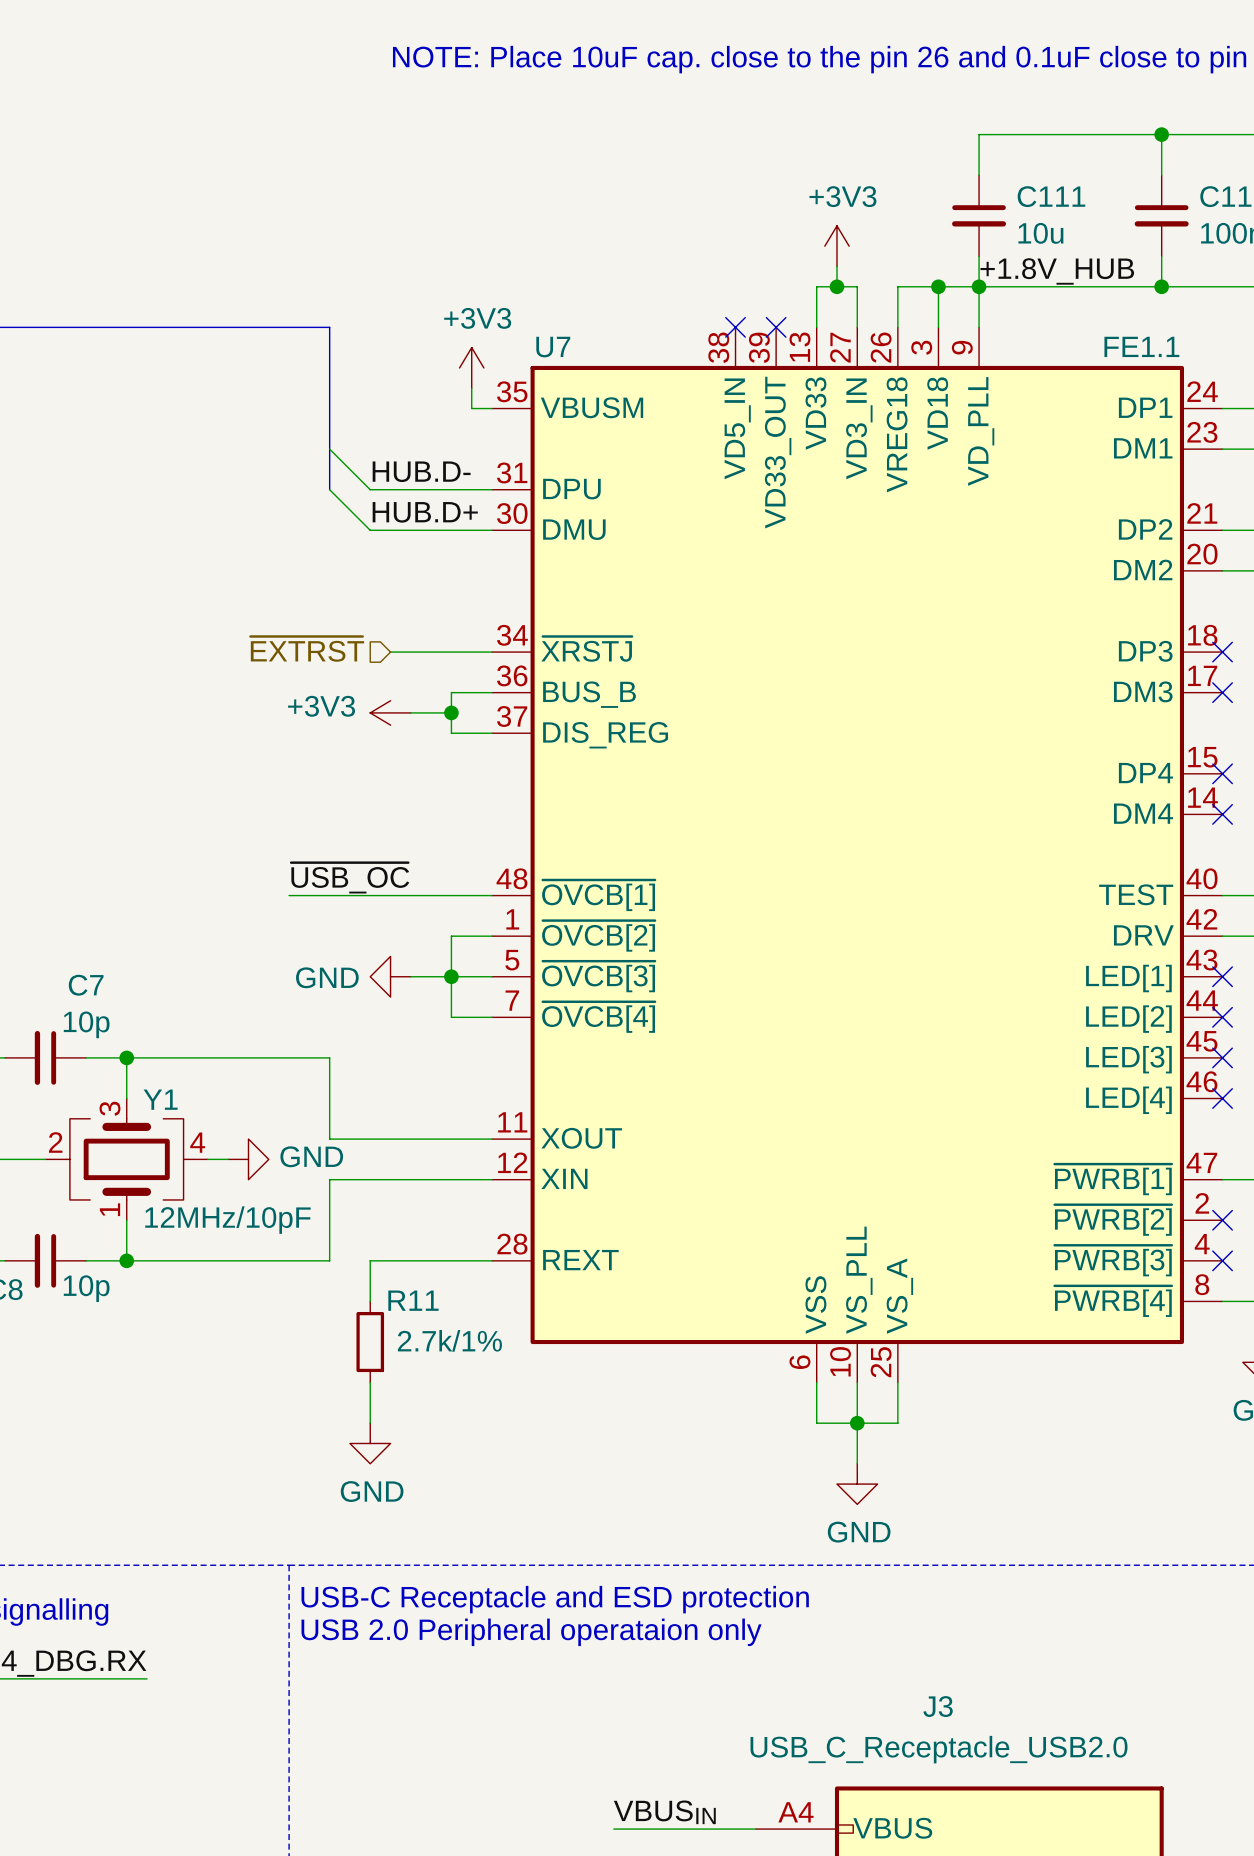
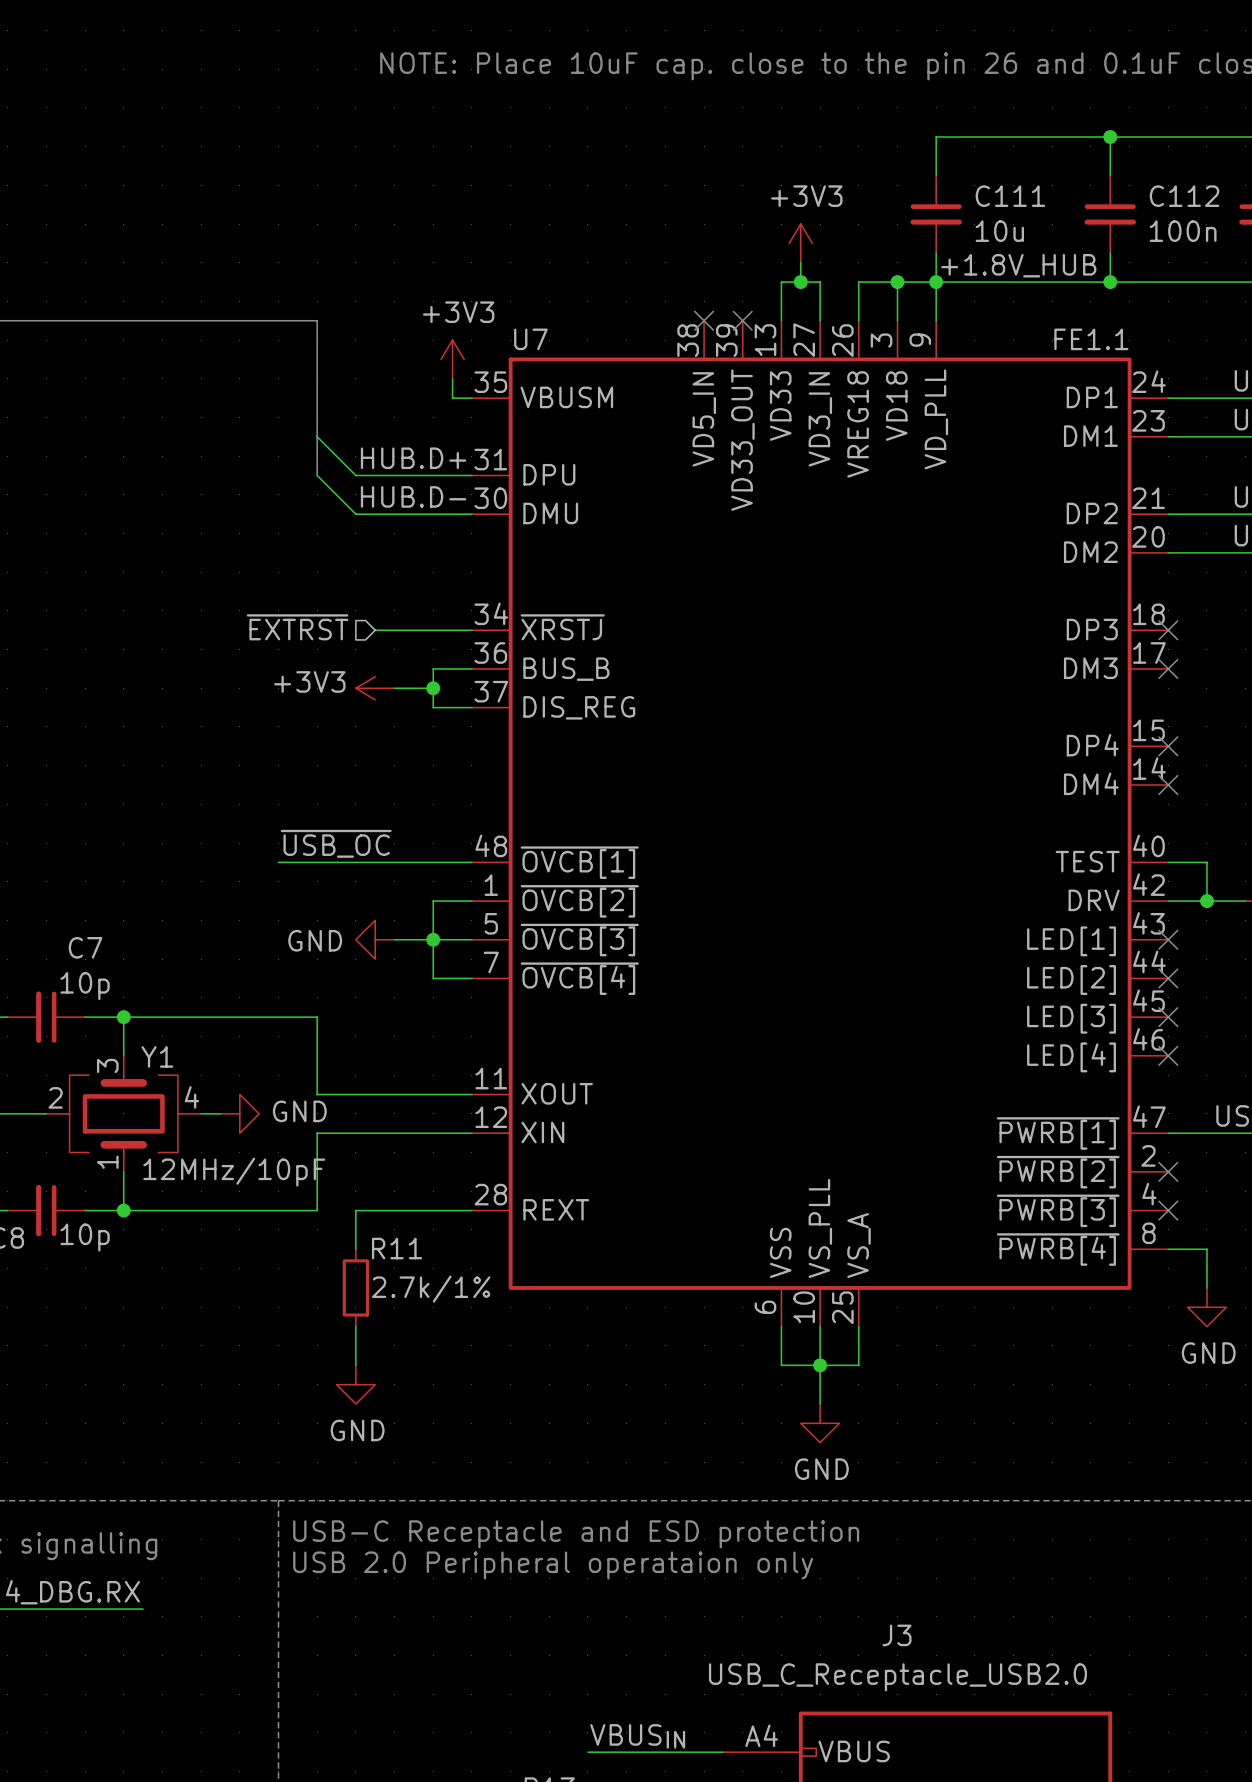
label: HUB.D- (421, 471) -> HUB.D+ (413, 458)
label: HUB.D+ (425, 512) -> HUB.D- (413, 496)

